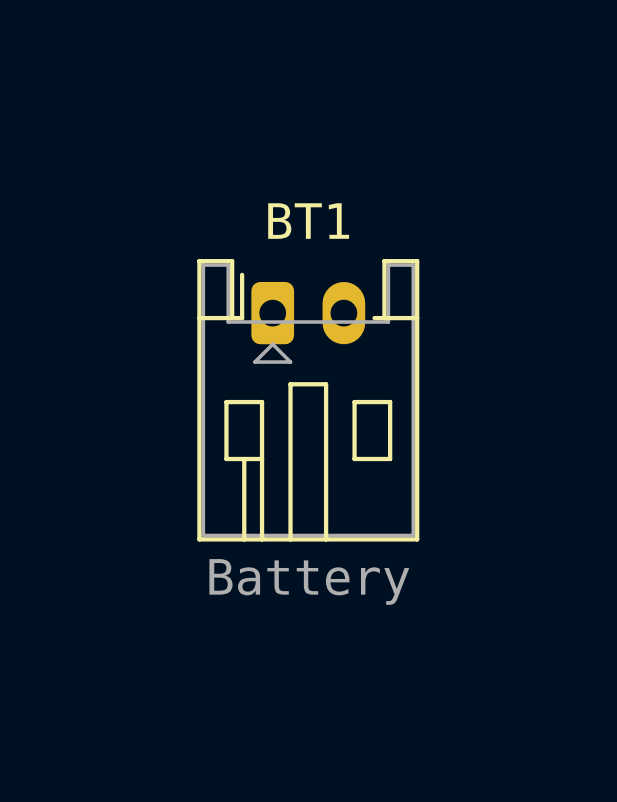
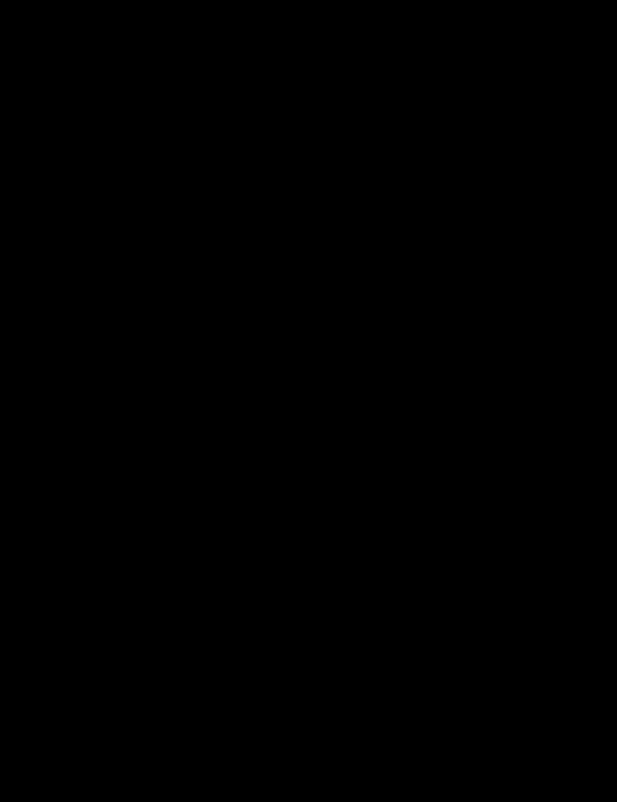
BT1: Battery (308, 400) -> none

